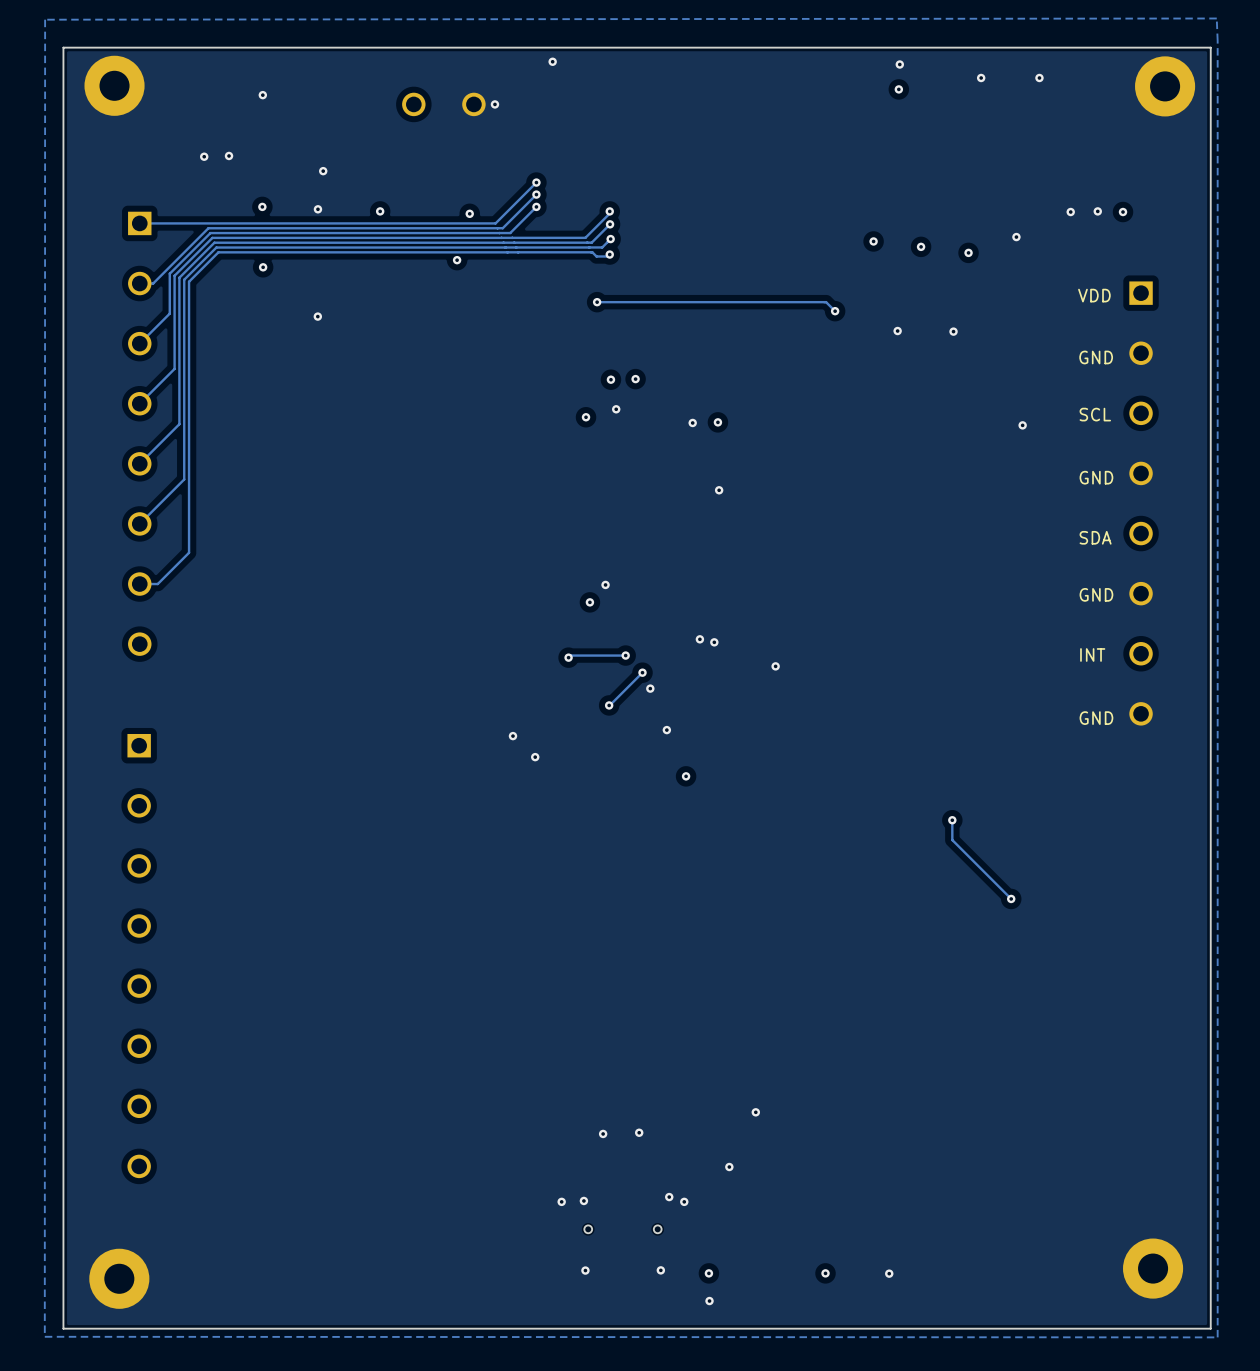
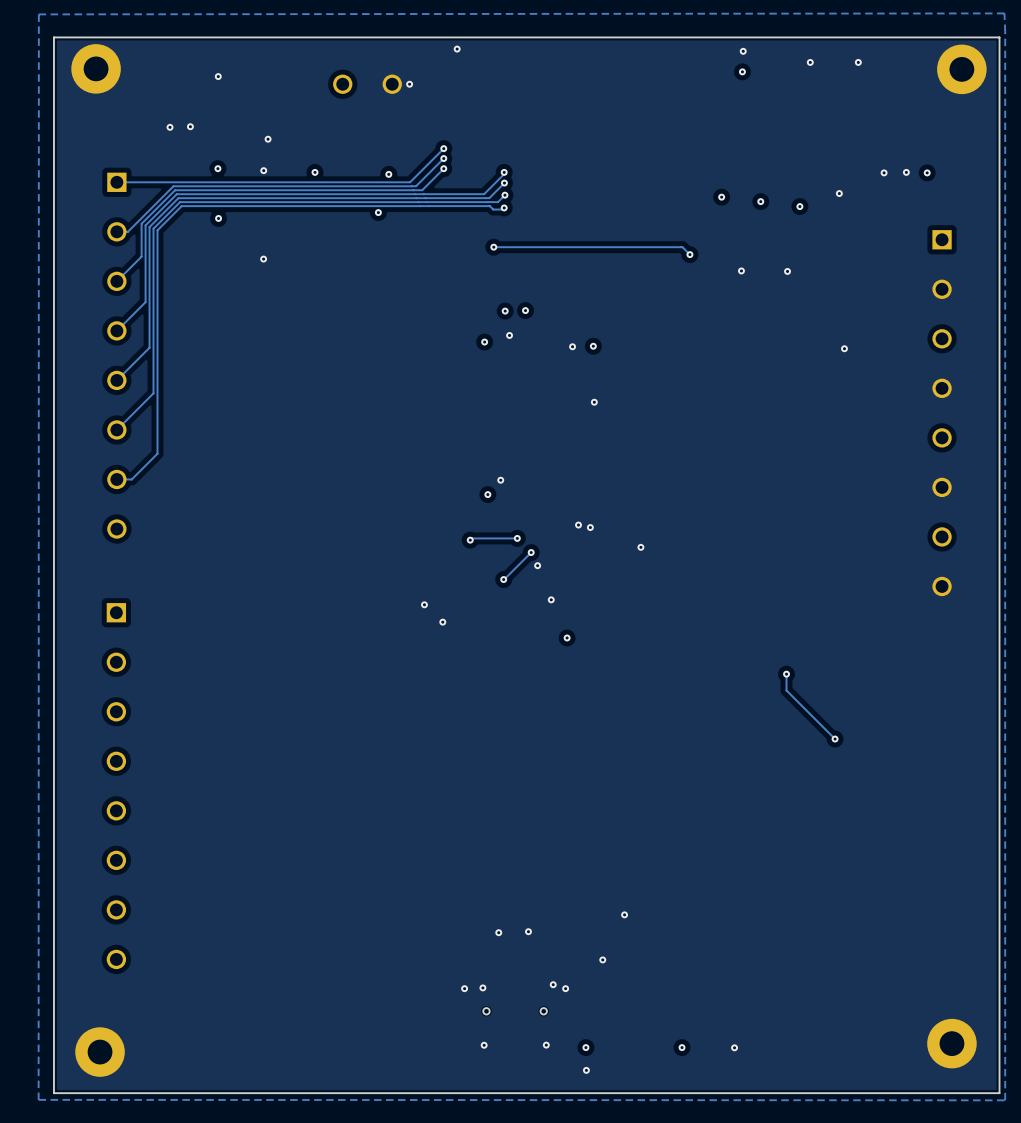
text: VDD (1094, 295) -> none
text: GND (1096, 357) -> none
text: SCL (1095, 414) -> none
text: GND (1096, 477) -> none
text: SDA (1095, 537) -> none
text: GND (1096, 594) -> none
text: INT (1092, 654) -> none
text: GND (1096, 718) -> none

